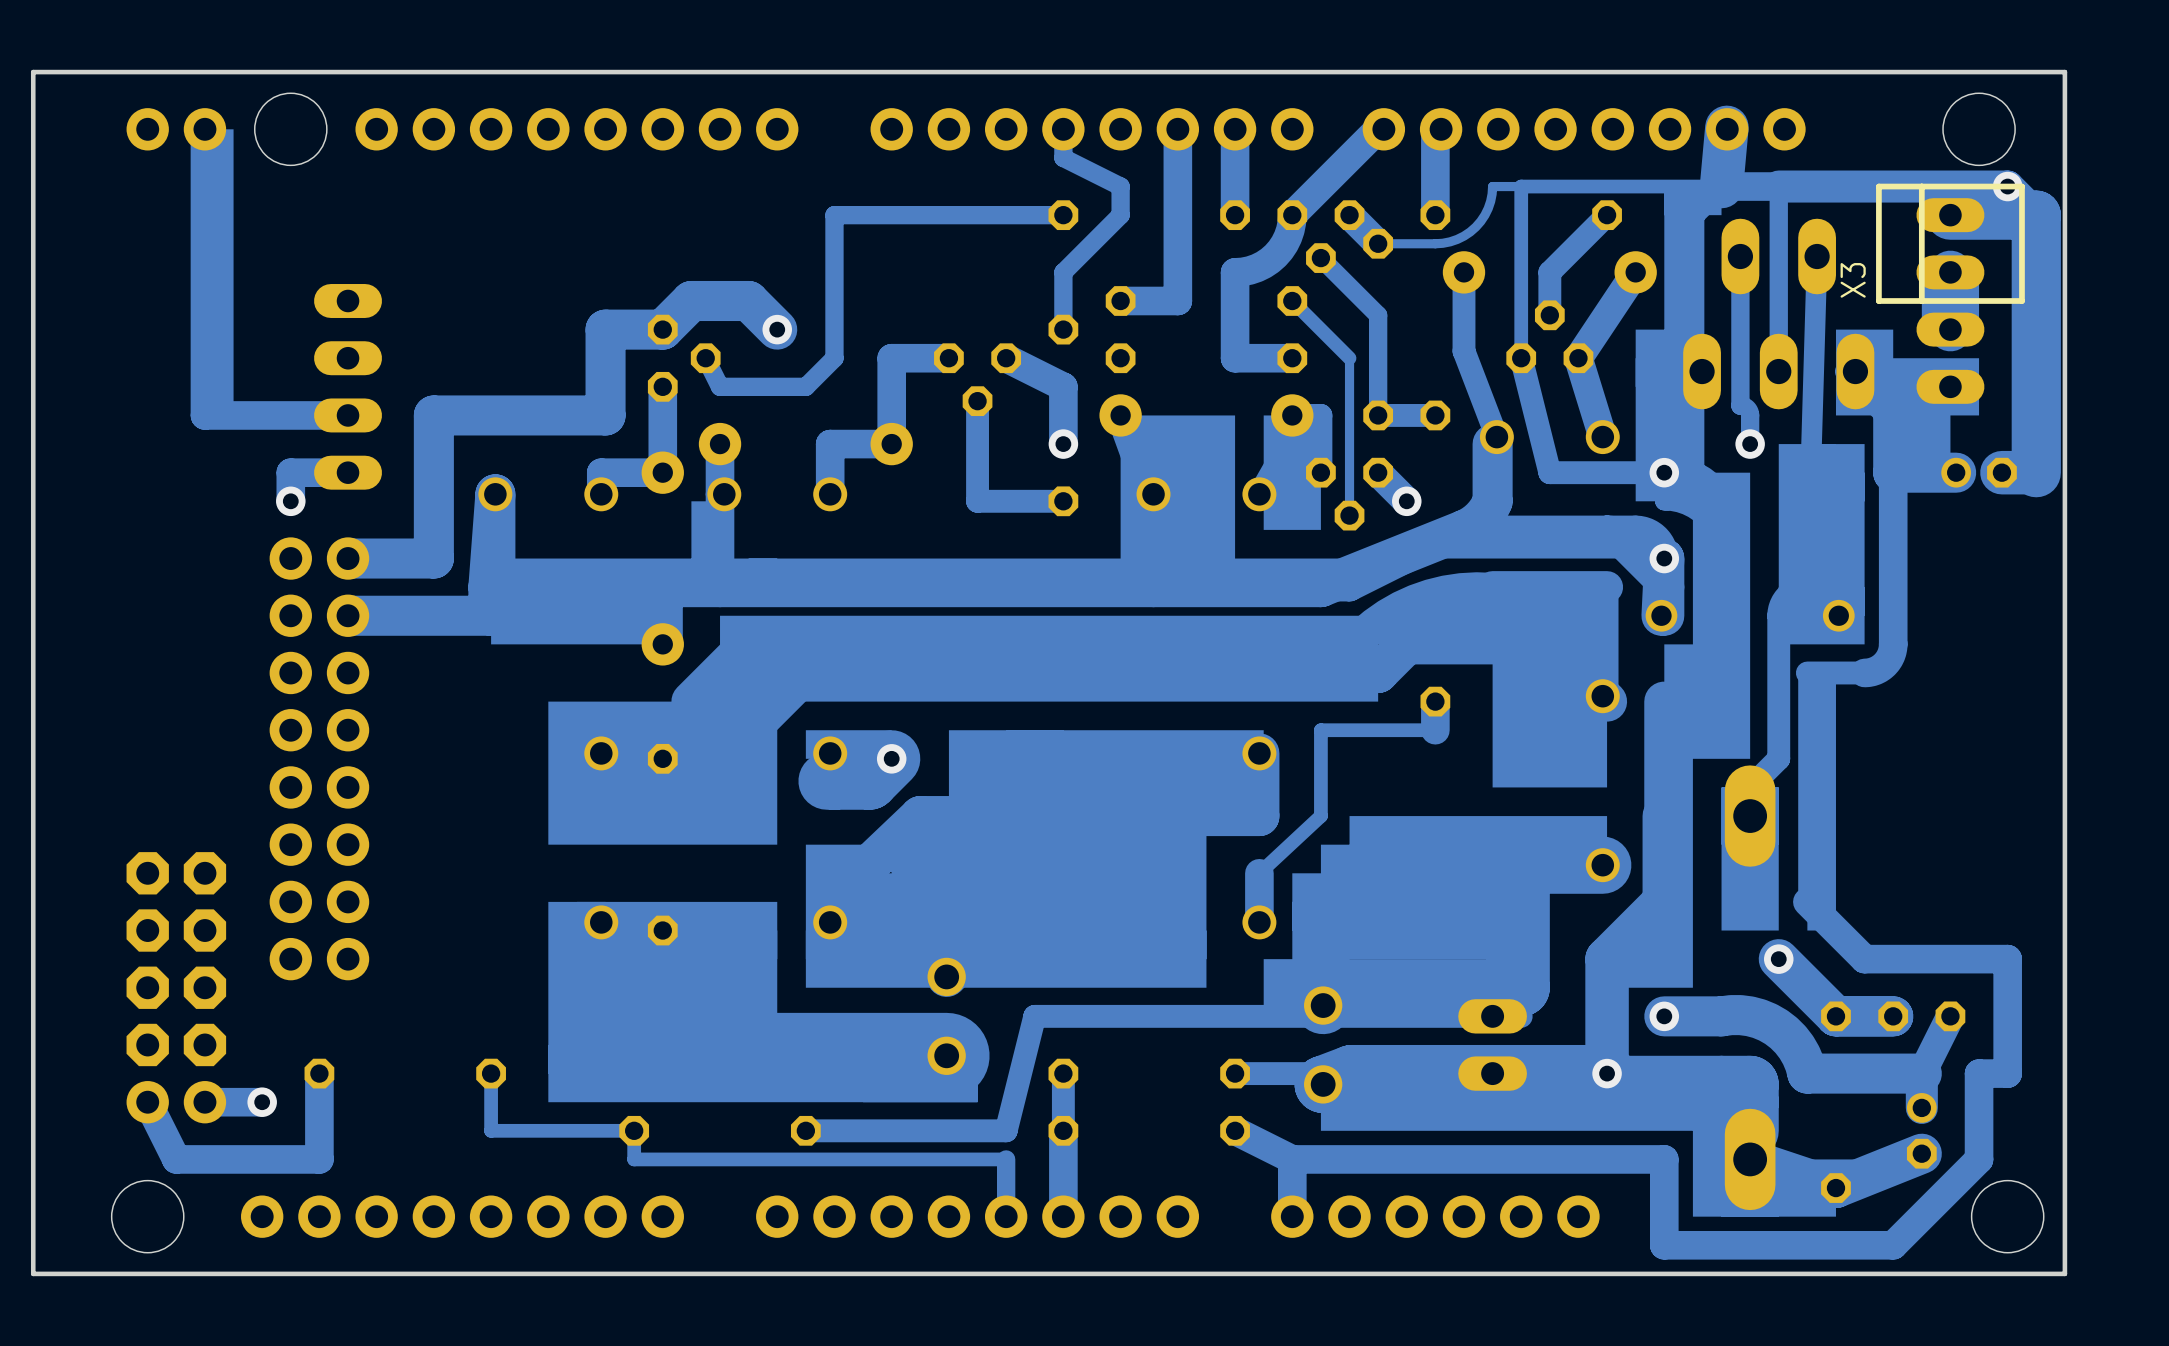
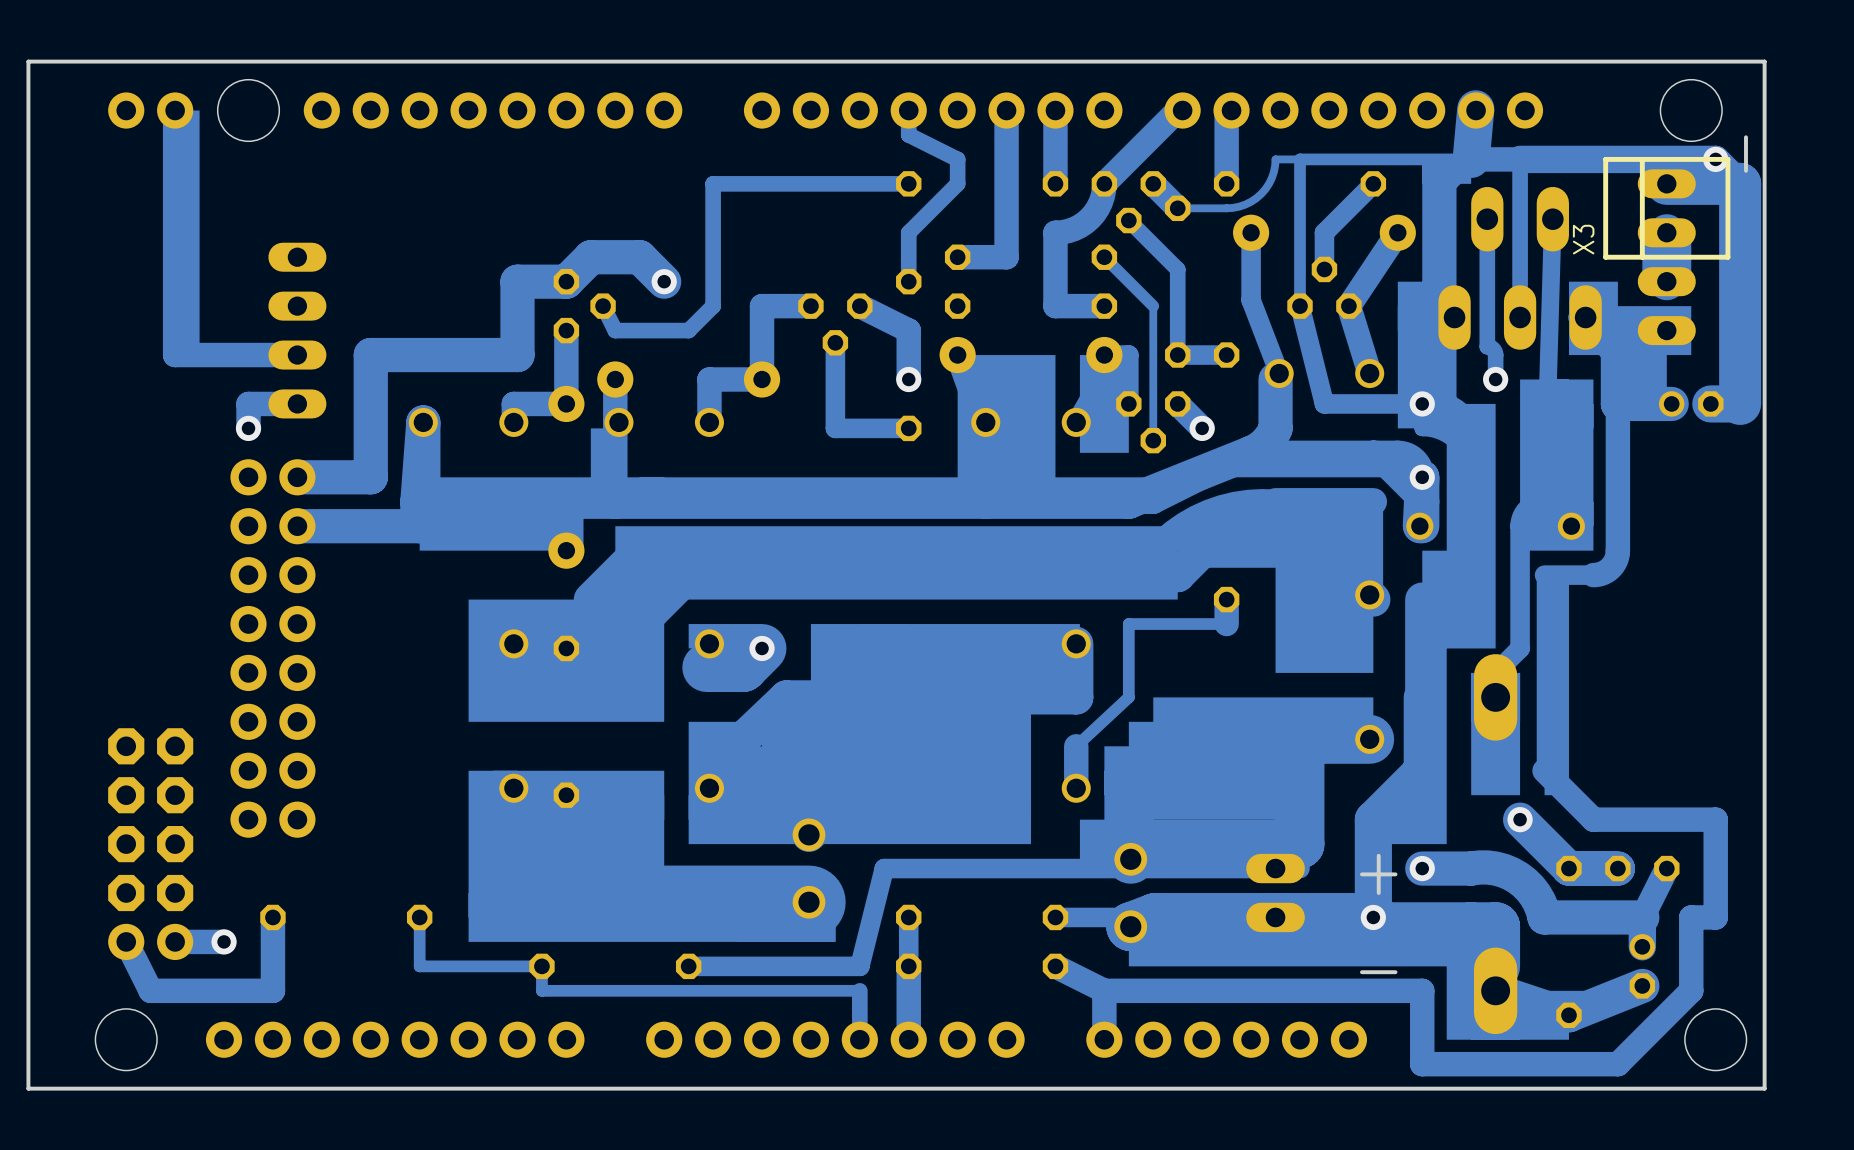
text: none -> - (1745, 154)
text: none -> + (1378, 874)
text: none -> - (1378, 972)

